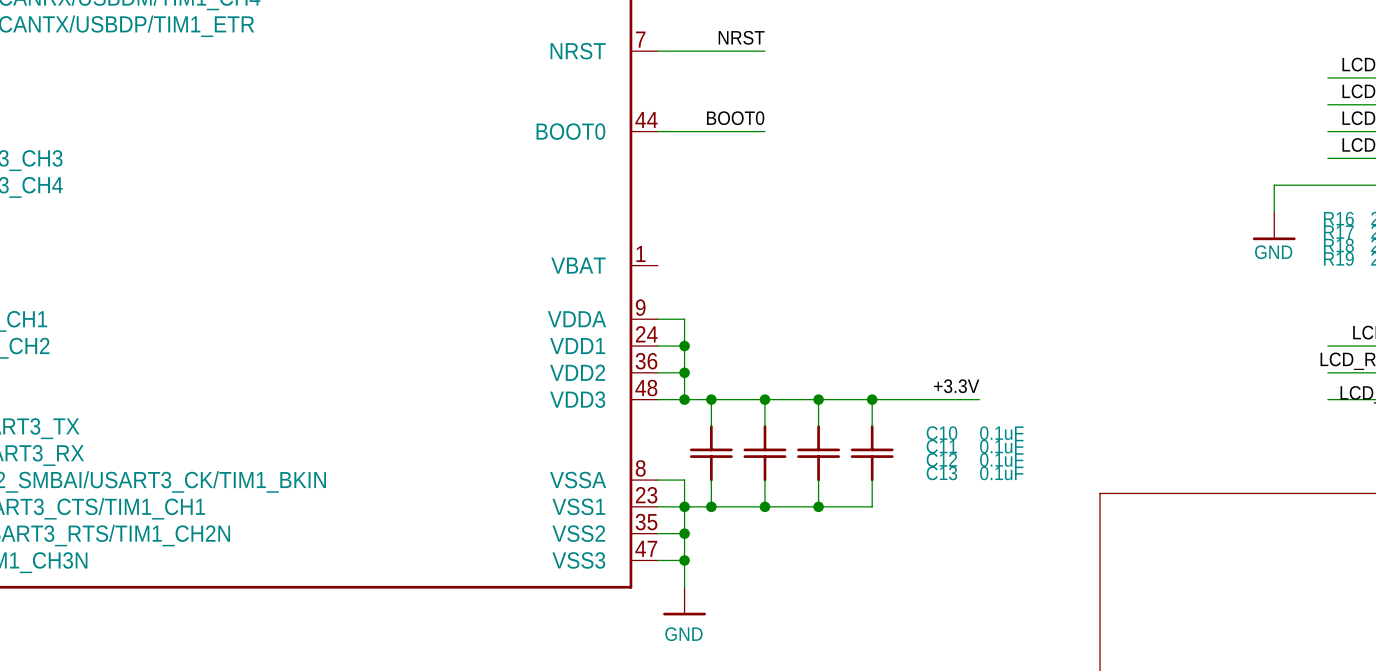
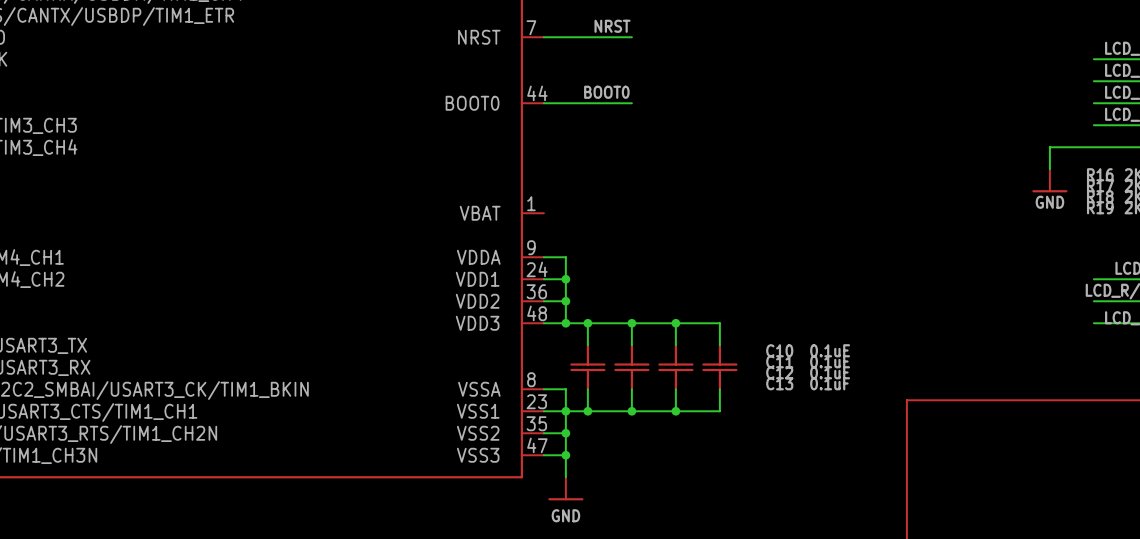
label: +3.3V (956, 386) -> none
wire: (872, 399) (979, 399) -> none
junction: (872, 399) -> none

